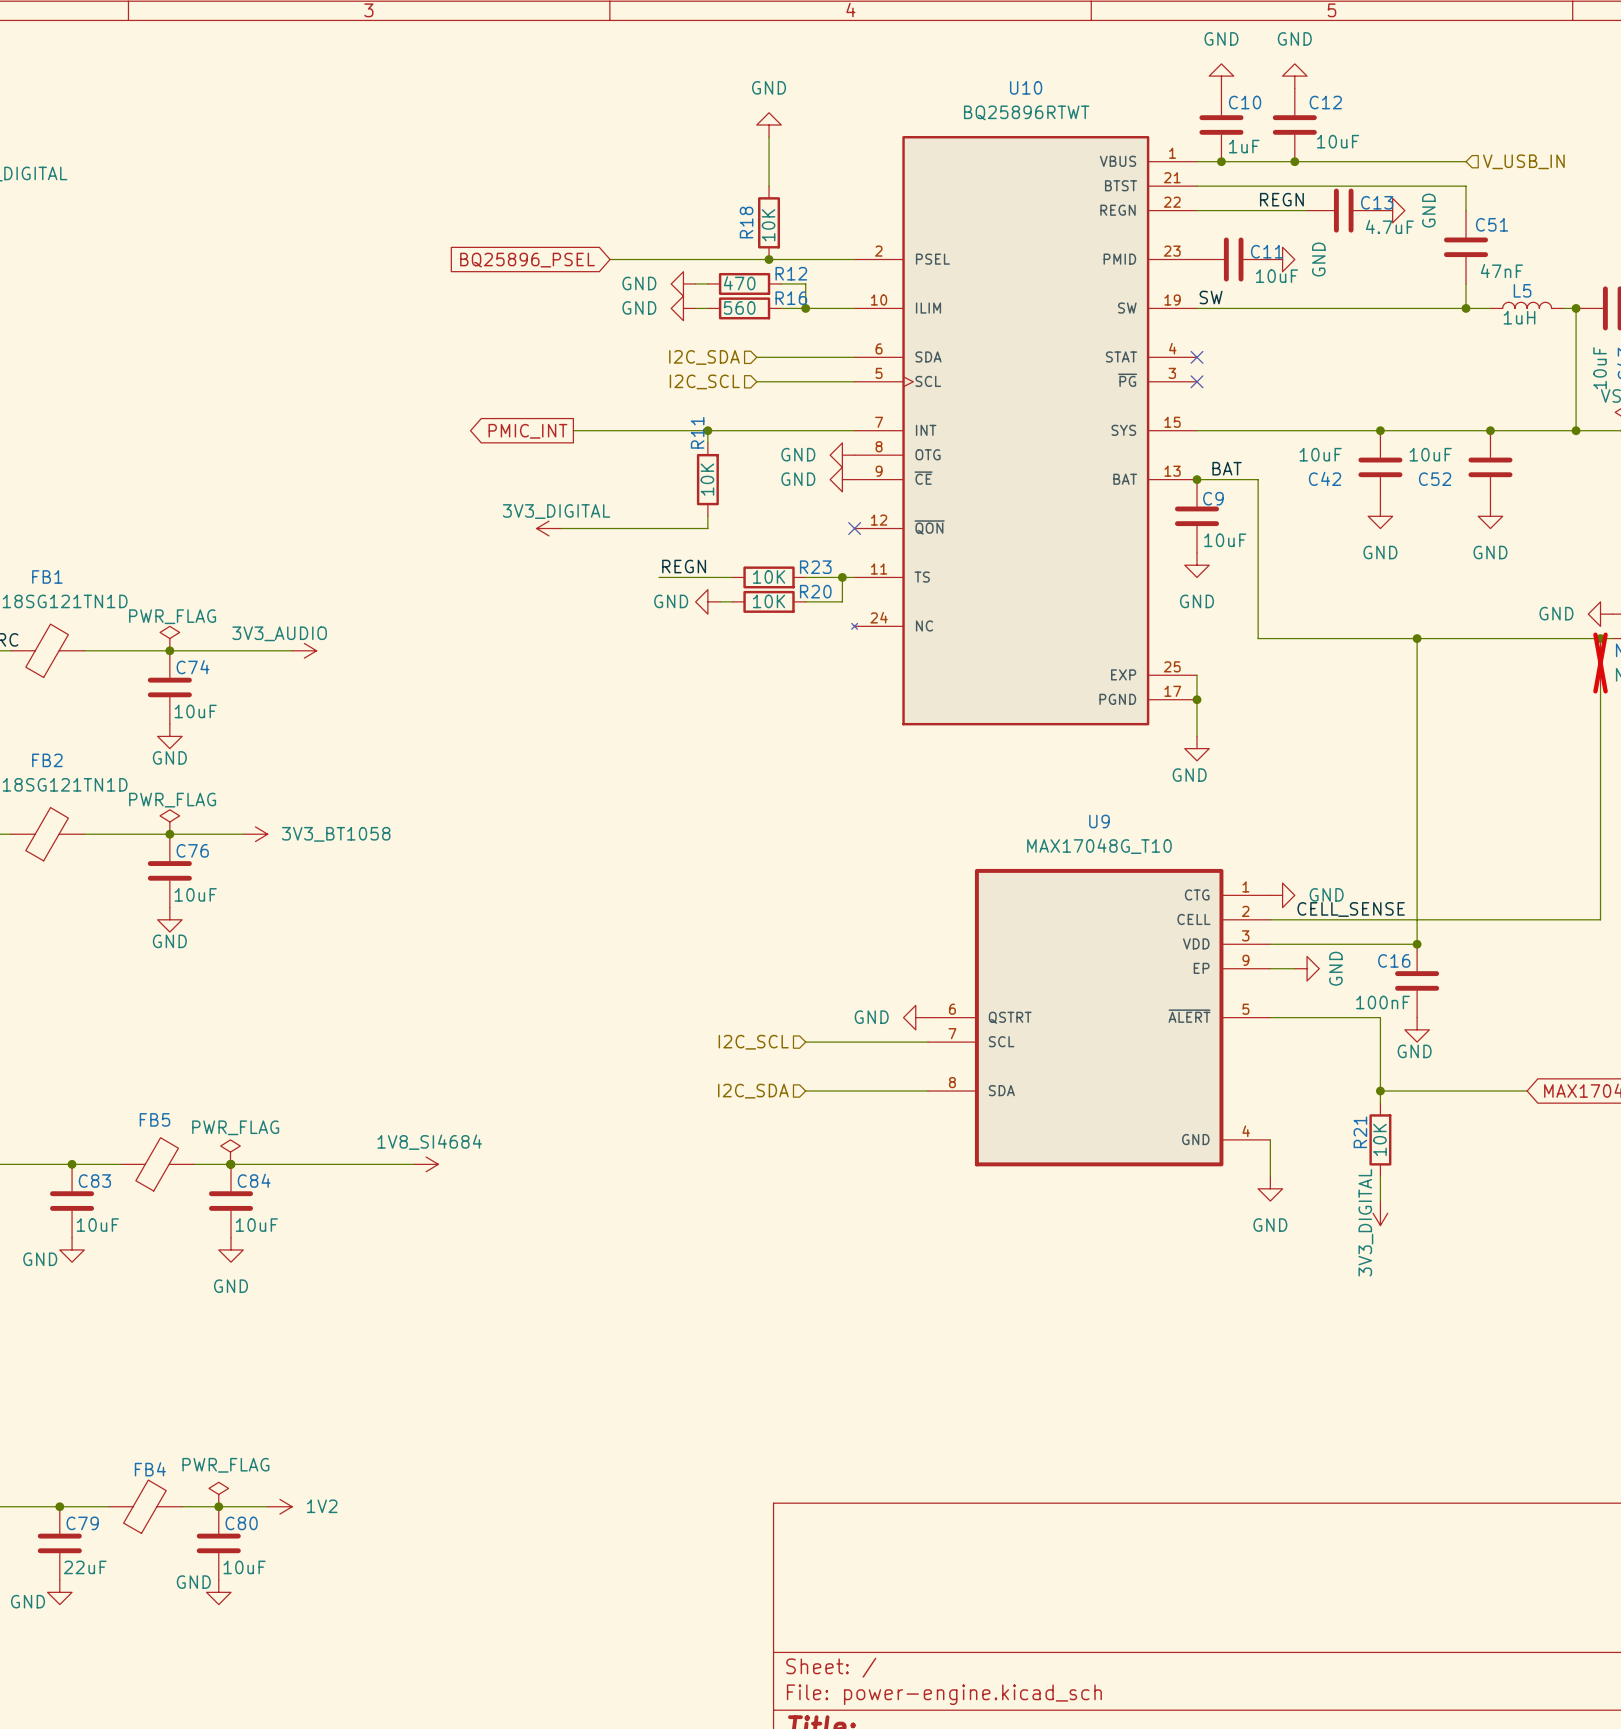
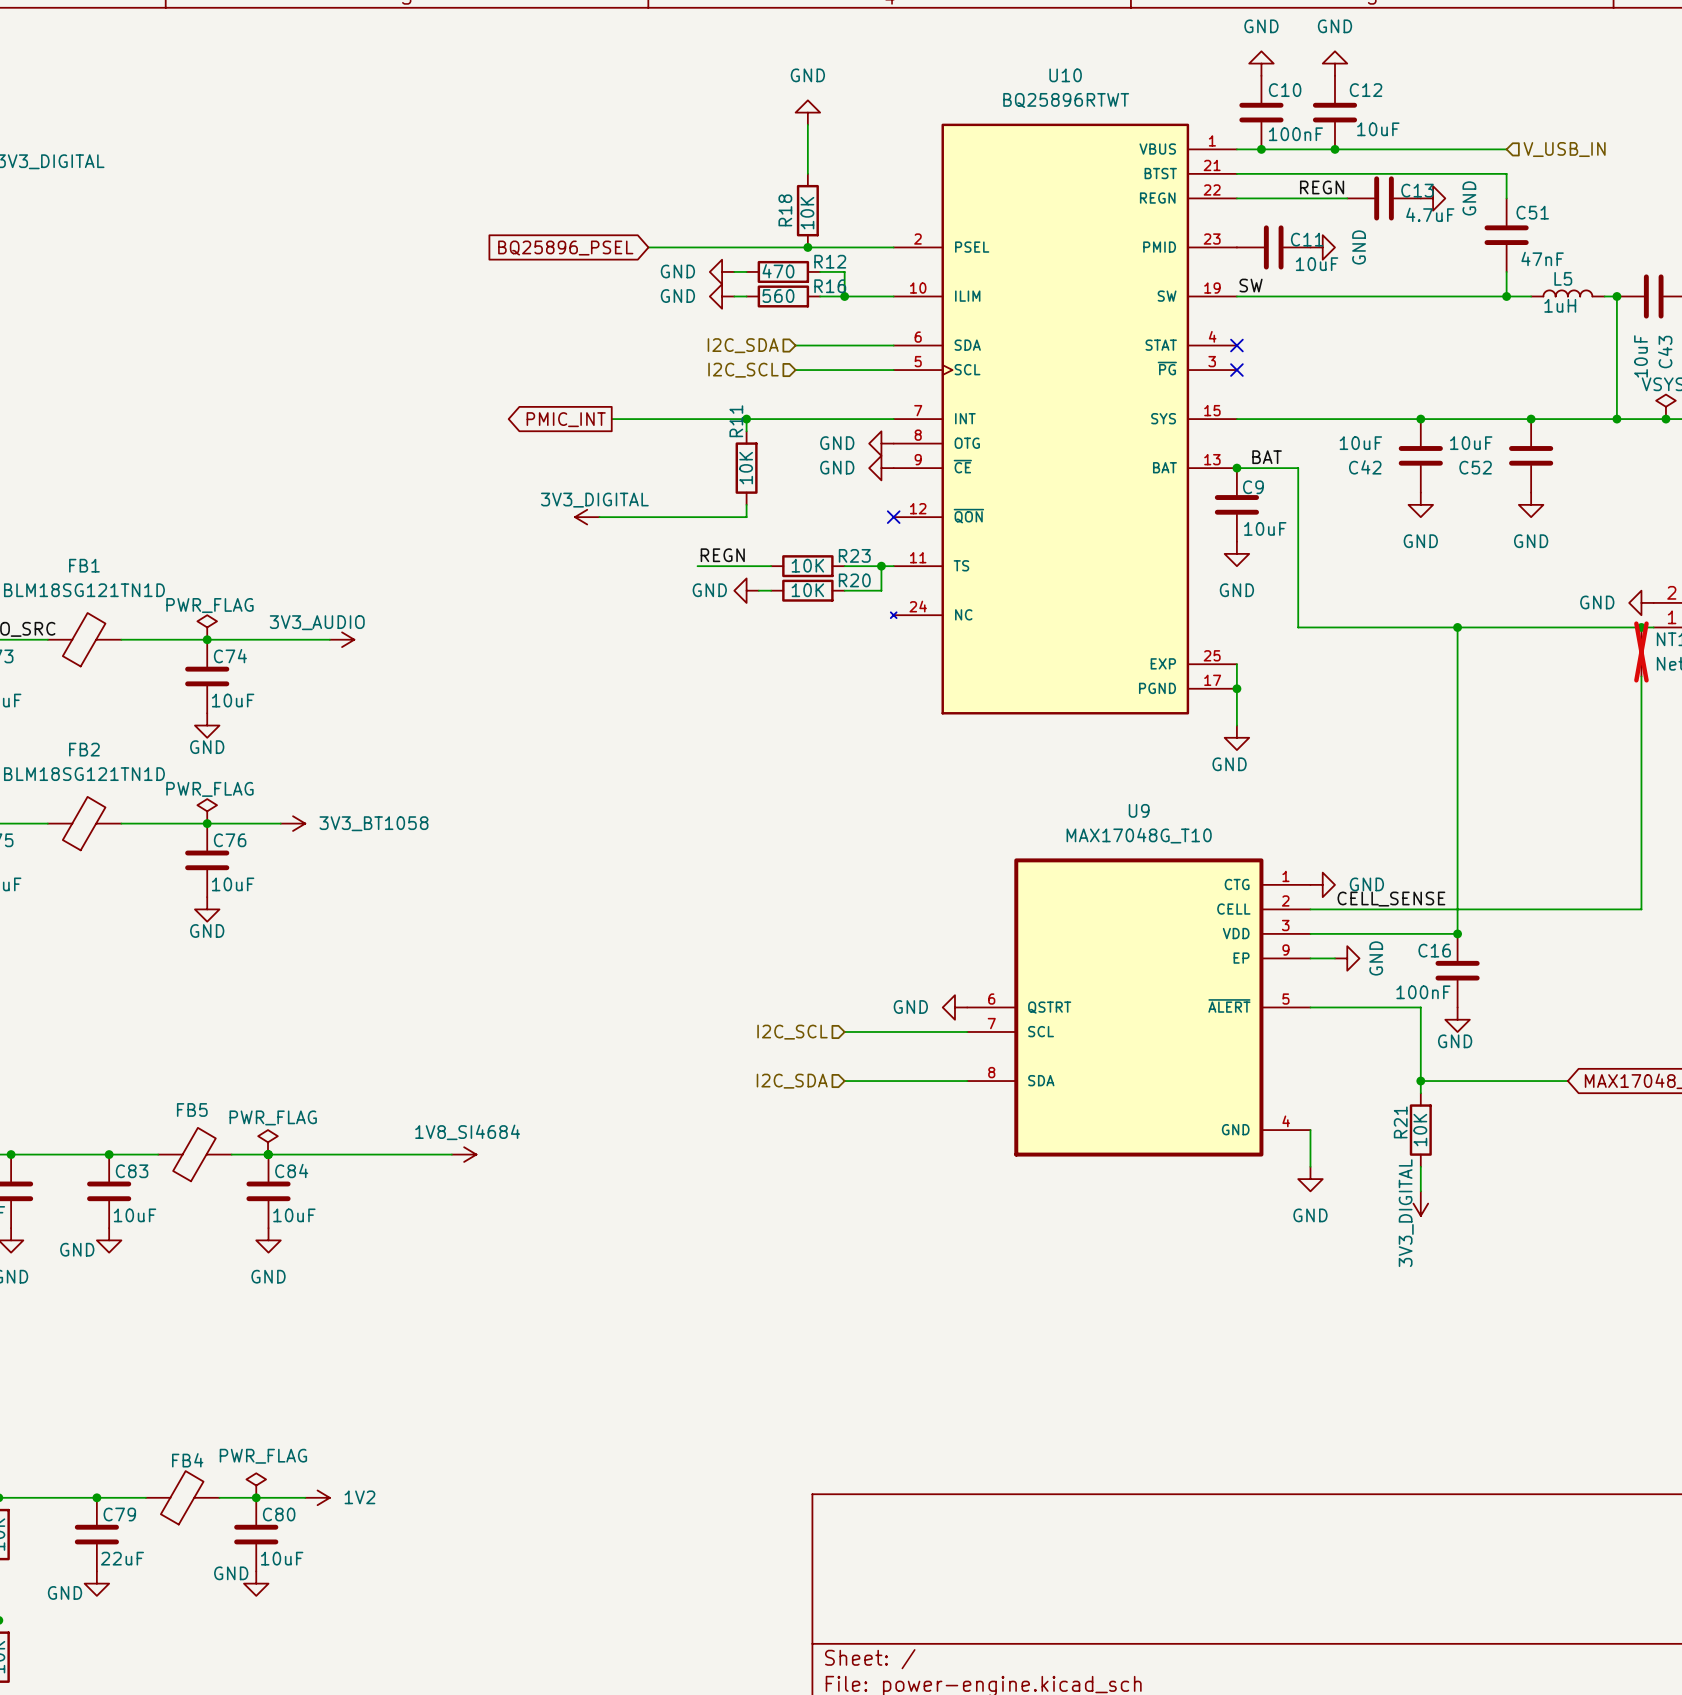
C10 value: 1uF (1244, 146) -> 100nF (1295, 134)

